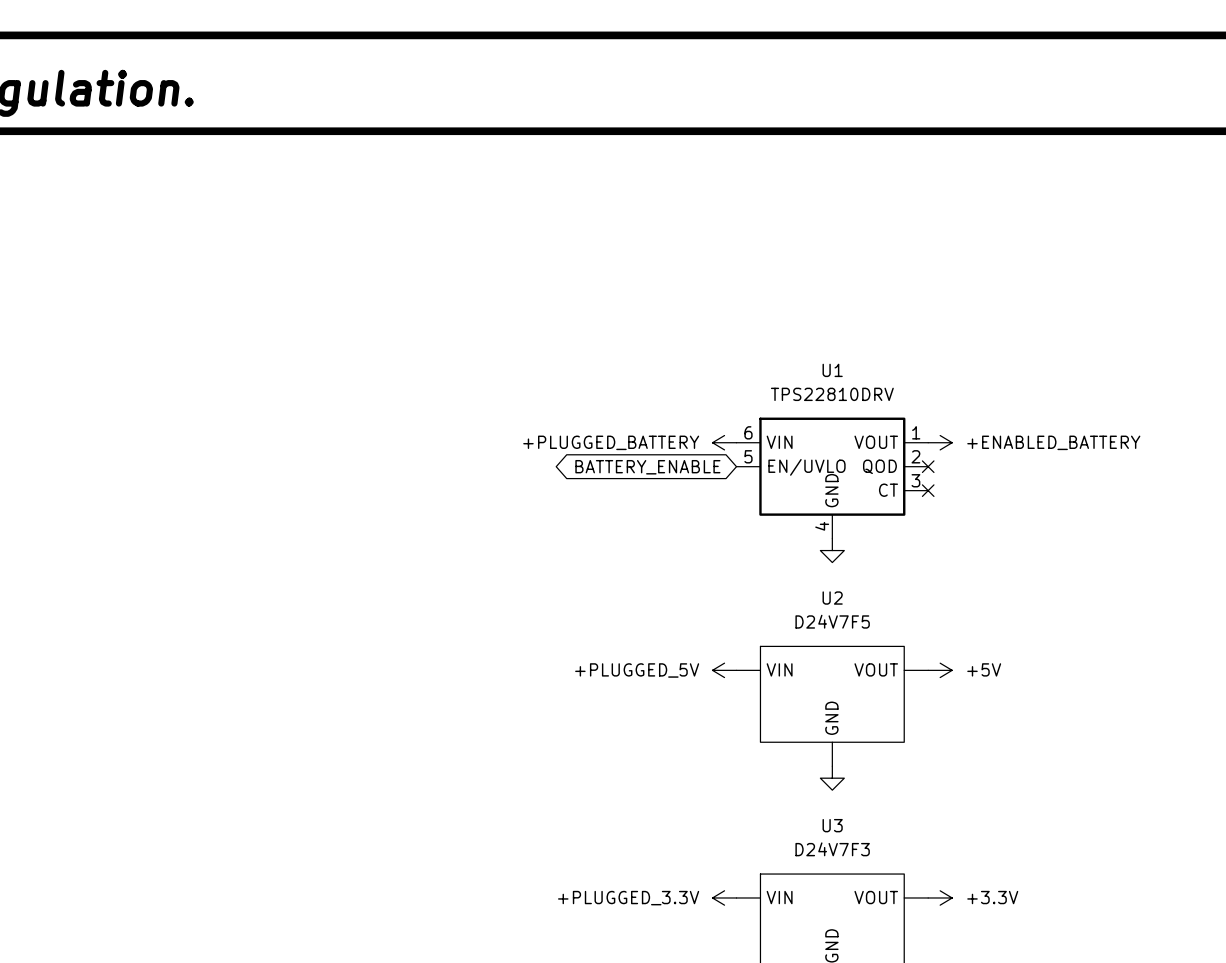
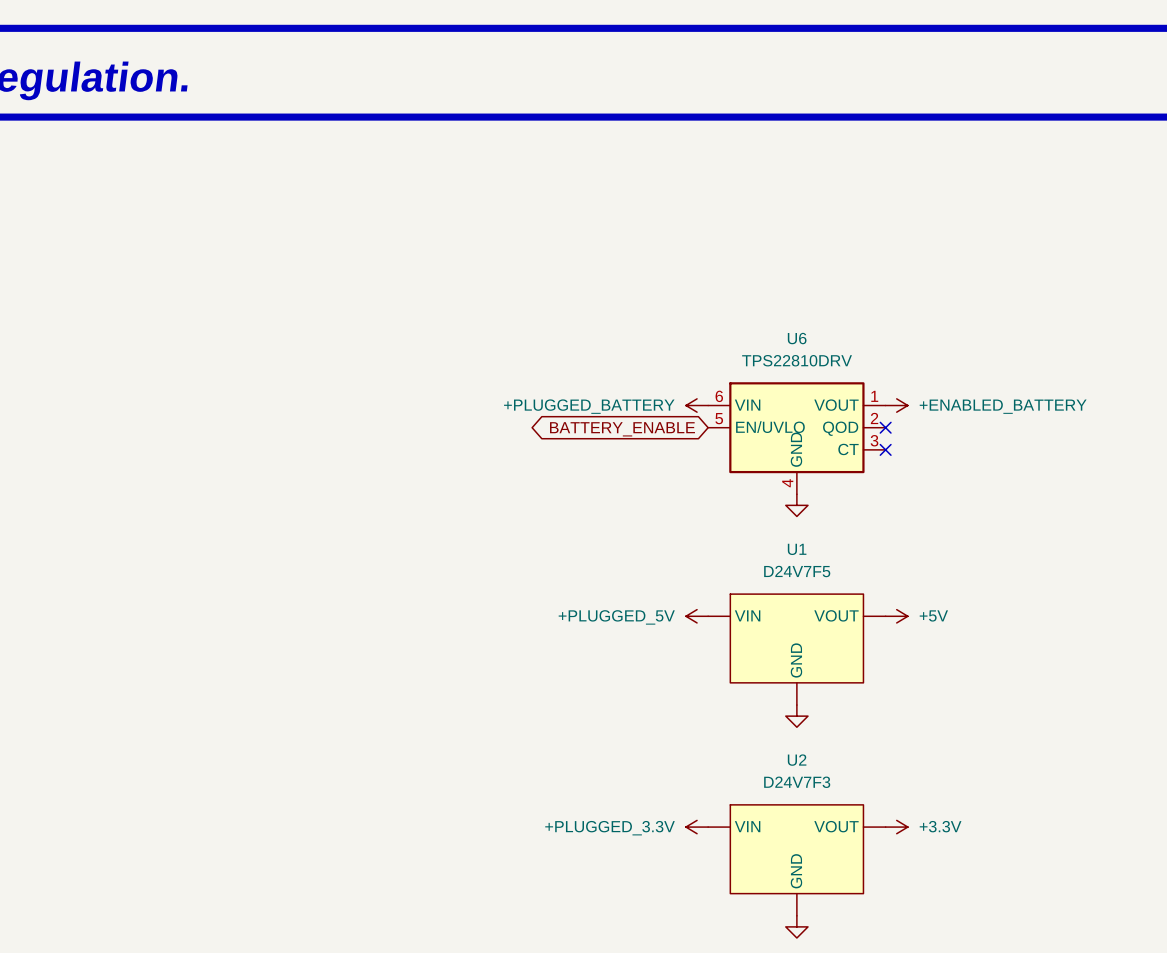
U1 name: U1 (832, 370) -> U6 (797, 338)
U2 name: U2 (832, 598) -> U1 (797, 549)
U3 name: U3 (832, 825) -> U2 (797, 760)

